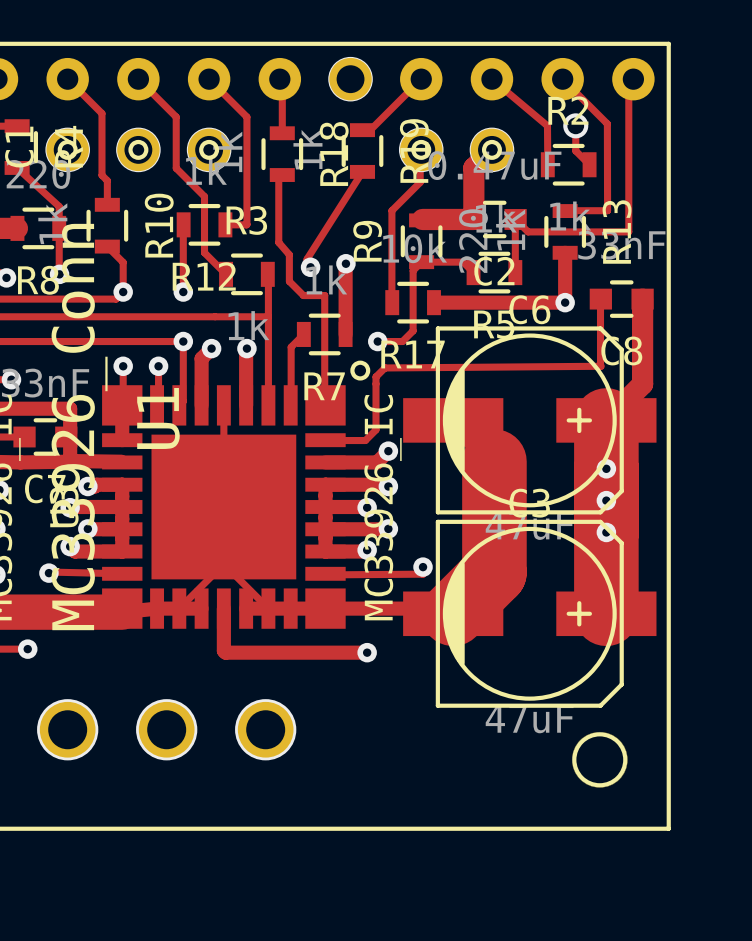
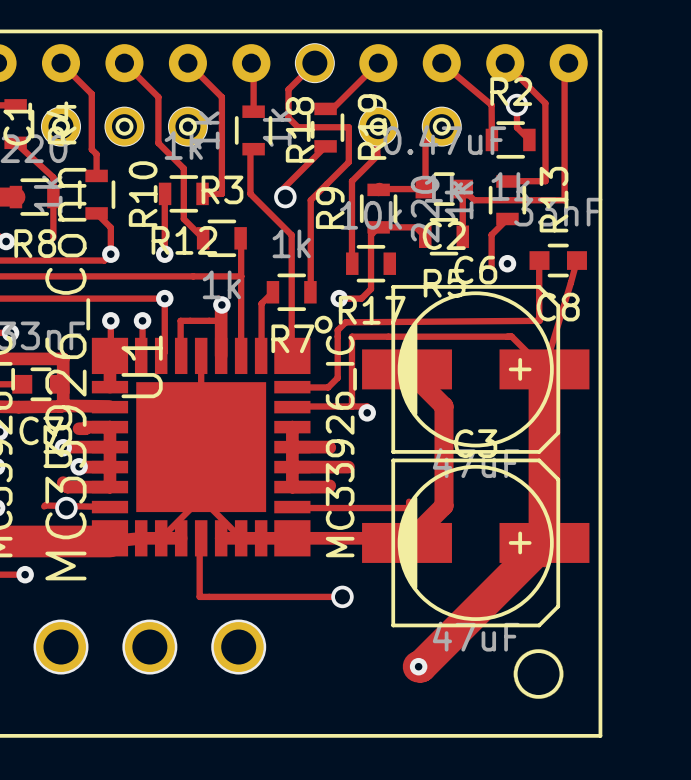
track width: thick (491, 149) (473, 168) (473, 219) (422, 219) -> thin (441, 126) (425, 142) (425, 189) (379, 189)
track: (362, 171) (307, 259) (307, 263) (310, 267) -> (325, 146) (282, 189) (282, 193) (285, 197)
track: (278, 224) (278, 242) (289, 254) (289, 281) (303, 295) (324, 295) -> (250, 193) (291, 235) (291, 257)
via: none -> (285, 197)
track: (565, 252) (565, 302) (434, 302) -> (507, 218) (491, 234) (491, 266)
via: (345, 263) -> none
track: (345, 264) (345, 334) -> (314, 63) (288, 89) (288, 117) (298, 127) (348, 127) (348, 162) (310, 200) (310, 291)
via: (310, 267) -> none
via: (59, 274) -> none
track: (642, 299) (642, 384) (606, 420) -> (576, 260) (544, 369) (511, 336) (351, 336) (351, 406)
track: (211, 348) (201, 358) (201, 405) -> (221, 324) (218, 320) (180, 320) (180, 355)
via: (211, 348) -> none
track width: thick (606, 420) (606, 613) -> thin (544, 369) (544, 542)
track: (388, 451) (377, 462) (325, 462) -> (367, 412) (367, 406) (293, 406)
via: (388, 451) -> none
track width: thick (494, 461) (494, 572) (453, 613) -> thin (444, 406) (444, 505) (407, 542)
via: none -> (367, 412)
via: (606, 468) -> none
track: (325, 484) (386, 484) (388, 486) -> none
via: (87, 486) -> none
via: (388, 486) -> none
via: (606, 500) -> none
via: (367, 507) -> none
via: (388, 528) -> none
via: (606, 532) -> none
via: (70, 546) -> none
via: (367, 550) -> none
track: (423, 567) (423, 574) (326, 574) -> (409, 501) (409, 508) (293, 508)
via: (423, 567) -> none
via: (48, 573) -> none
via: none -> (66, 508)
track: (223, 608) (223, 650) (225, 652) (367, 652) -> none
track: none -> (199, 539) (199, 596) (342, 596)
track: none -> (544, 542) (418, 666)
via position: (367, 652) -> (342, 596)
via: none -> (418, 666)

